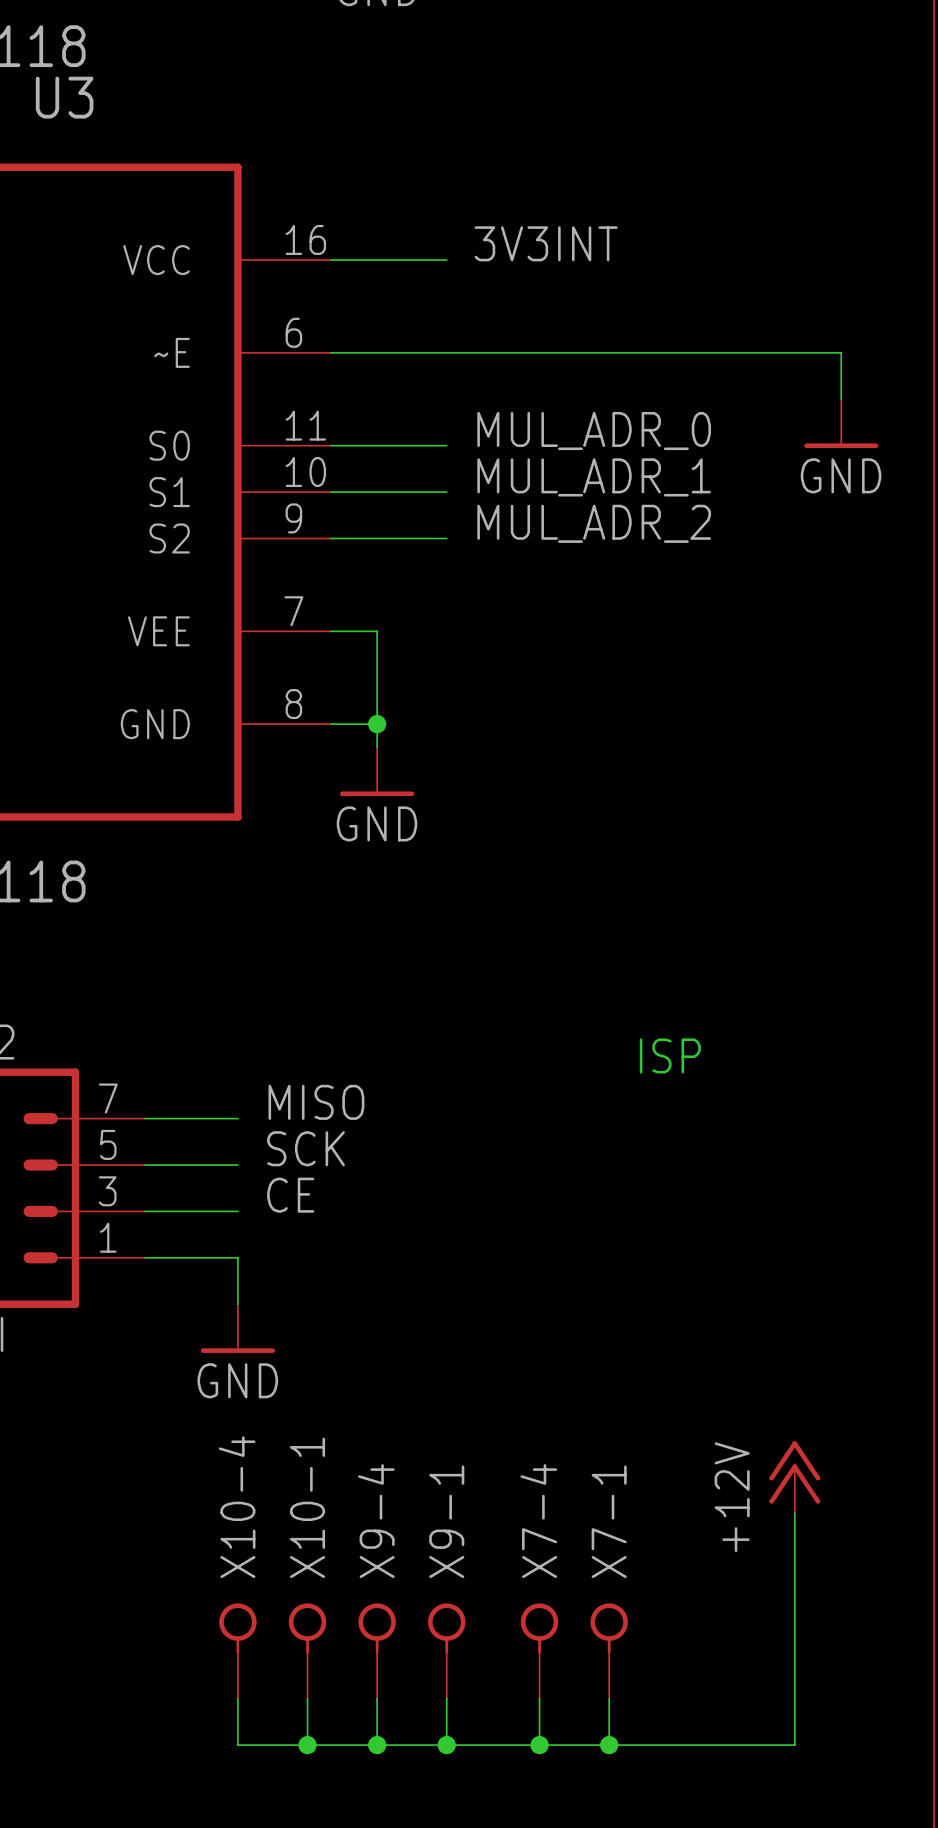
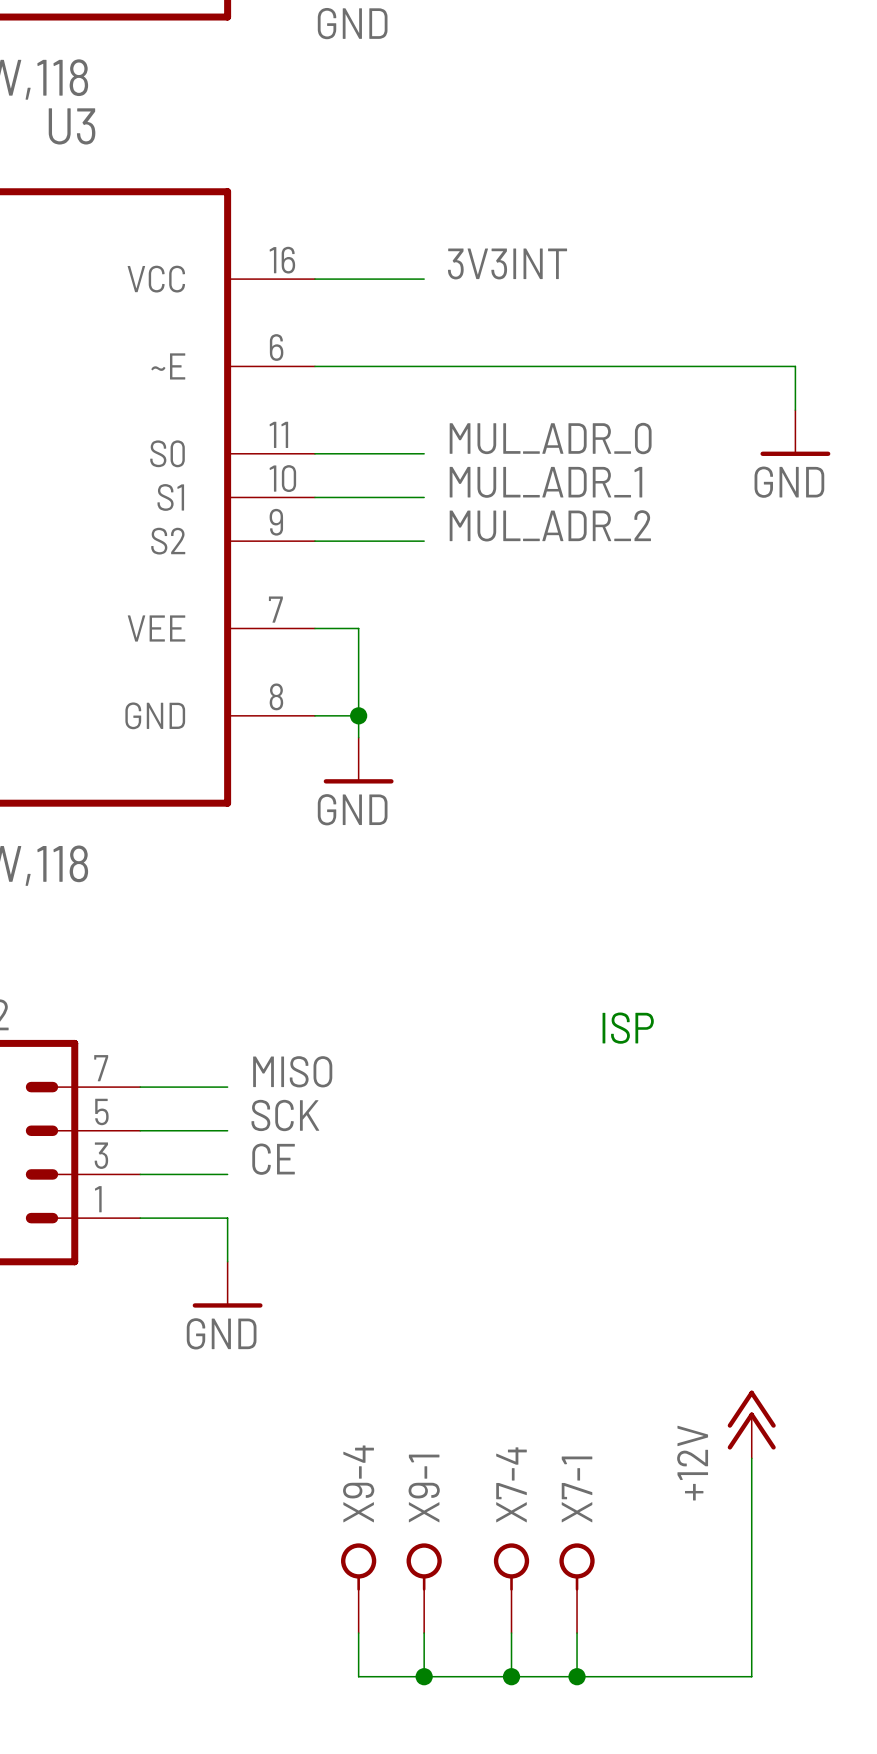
X10-4: (237, 1651) -> none
X10-1: (307, 1651) -> none
wire: (237, 1698) (237, 1745) (377, 1745) -> none
wire: (307, 1698) (307, 1745) -> none
junction: (307, 1745) -> none
junction: (377, 1745) -> none

